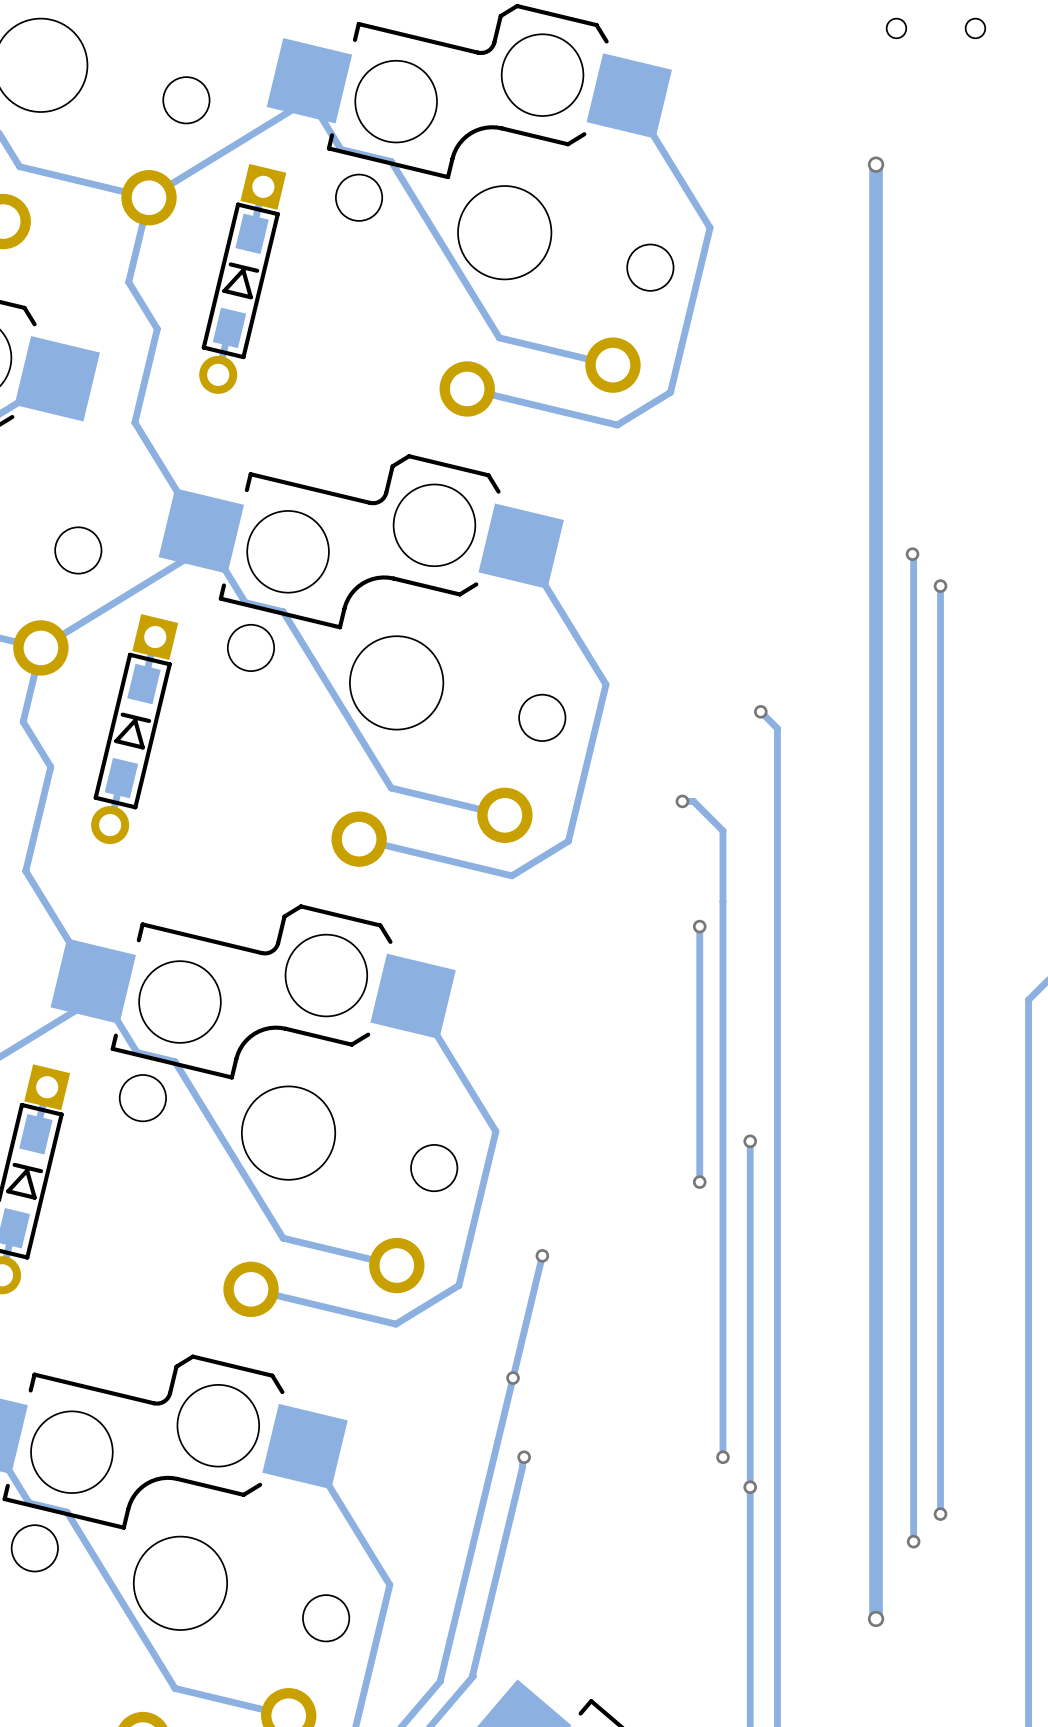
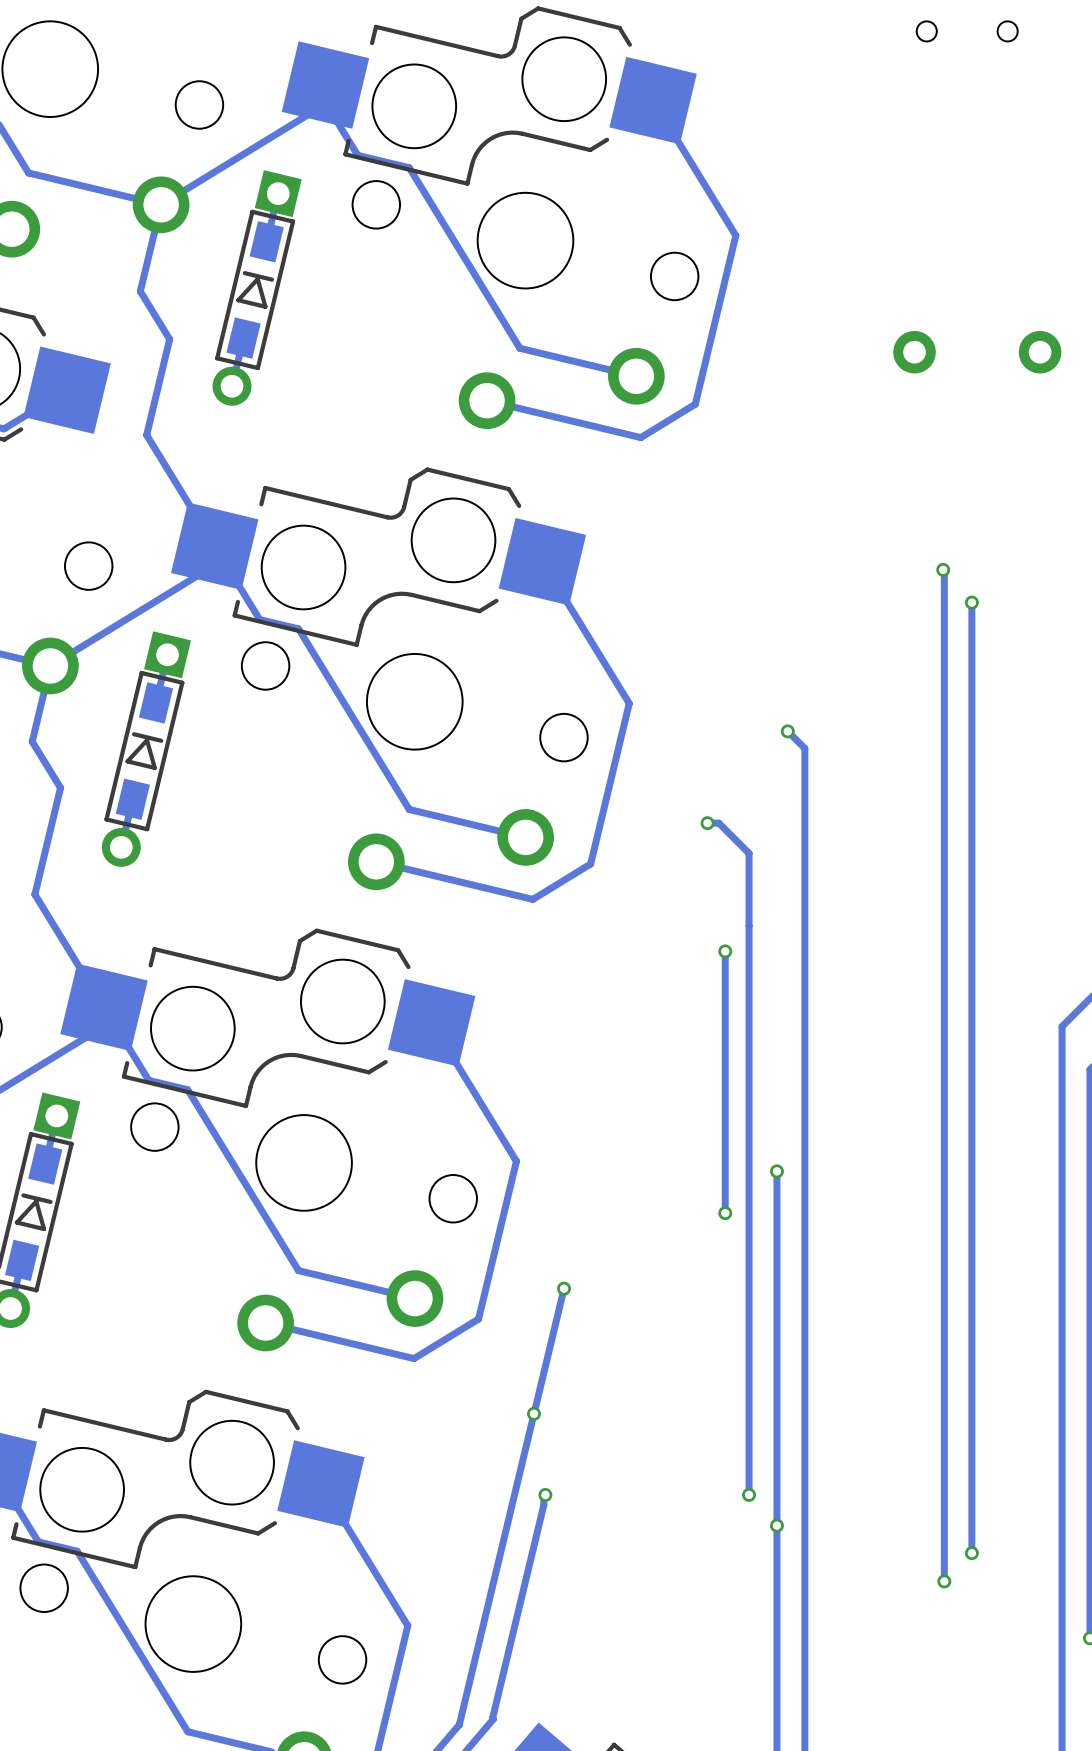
track: (876, 164) (876, 1618) -> none
via: (876, 164) -> none
part: none -> (914, 352)
part: none -> (1040, 352)
via: (876, 1618) -> none

